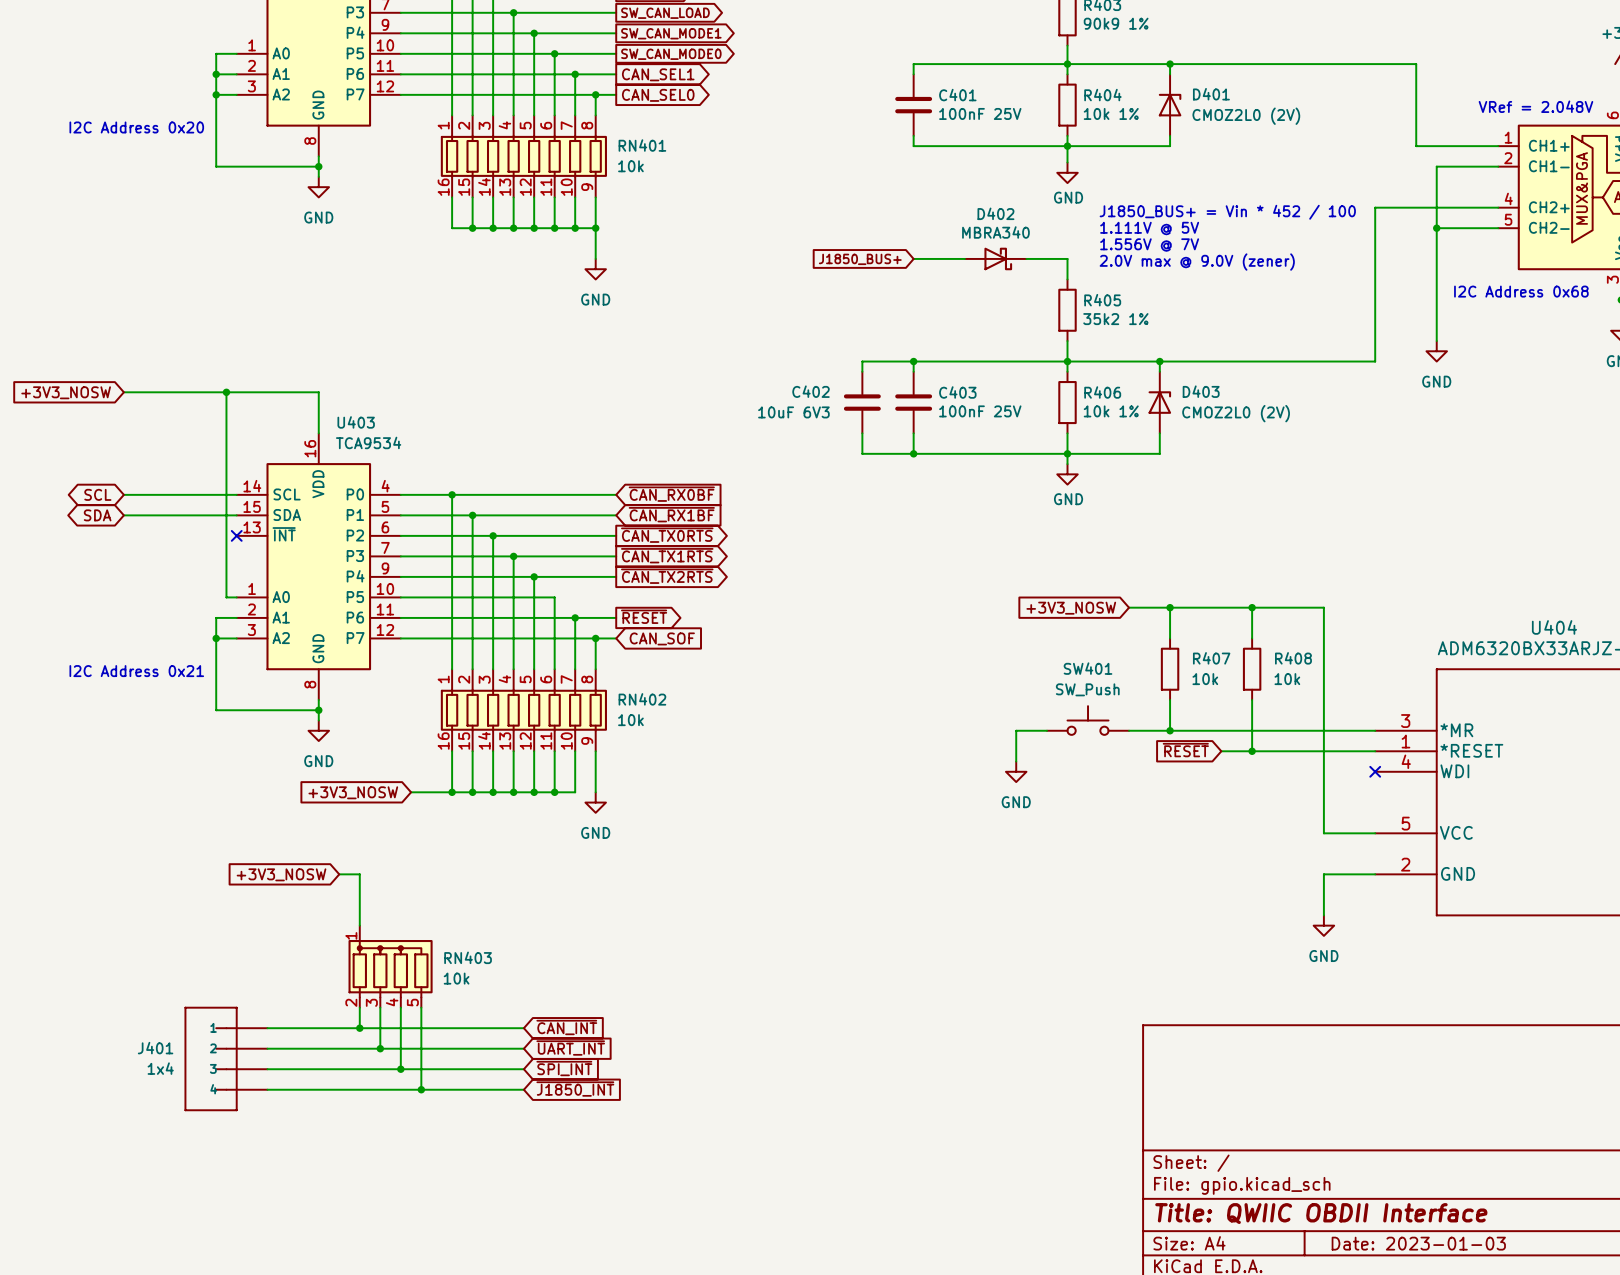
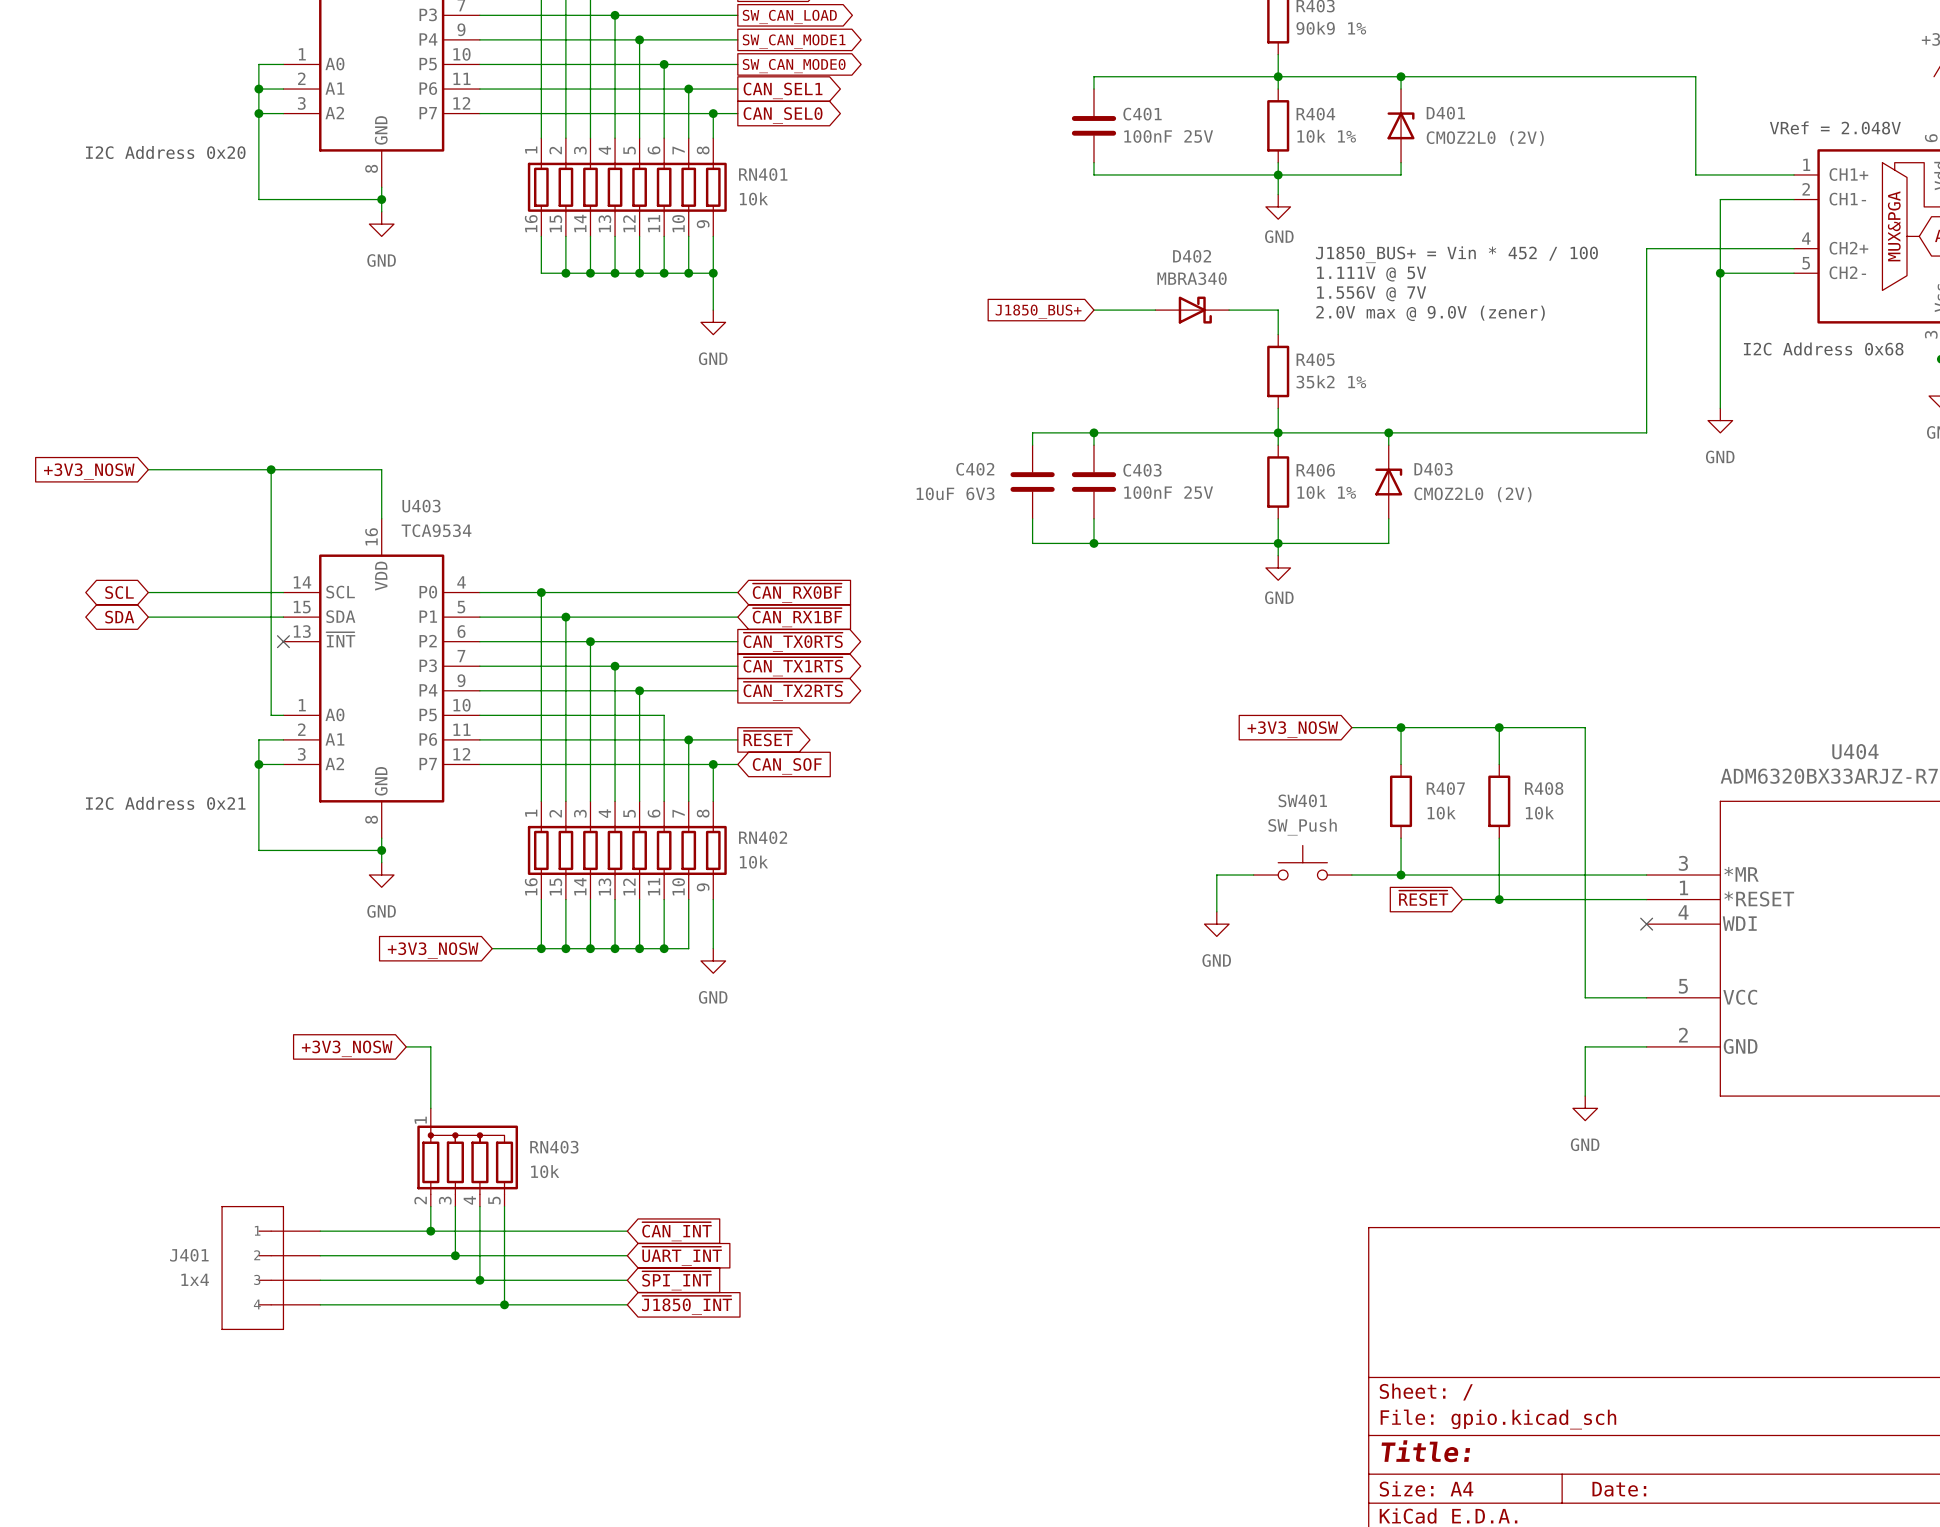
title block: Title: QWIIC OBDII Interface (1321, 1213) -> Title: (1425, 1451)
title block: Date: 2023-01-03 (1418, 1243) -> Date: (1619, 1489)

